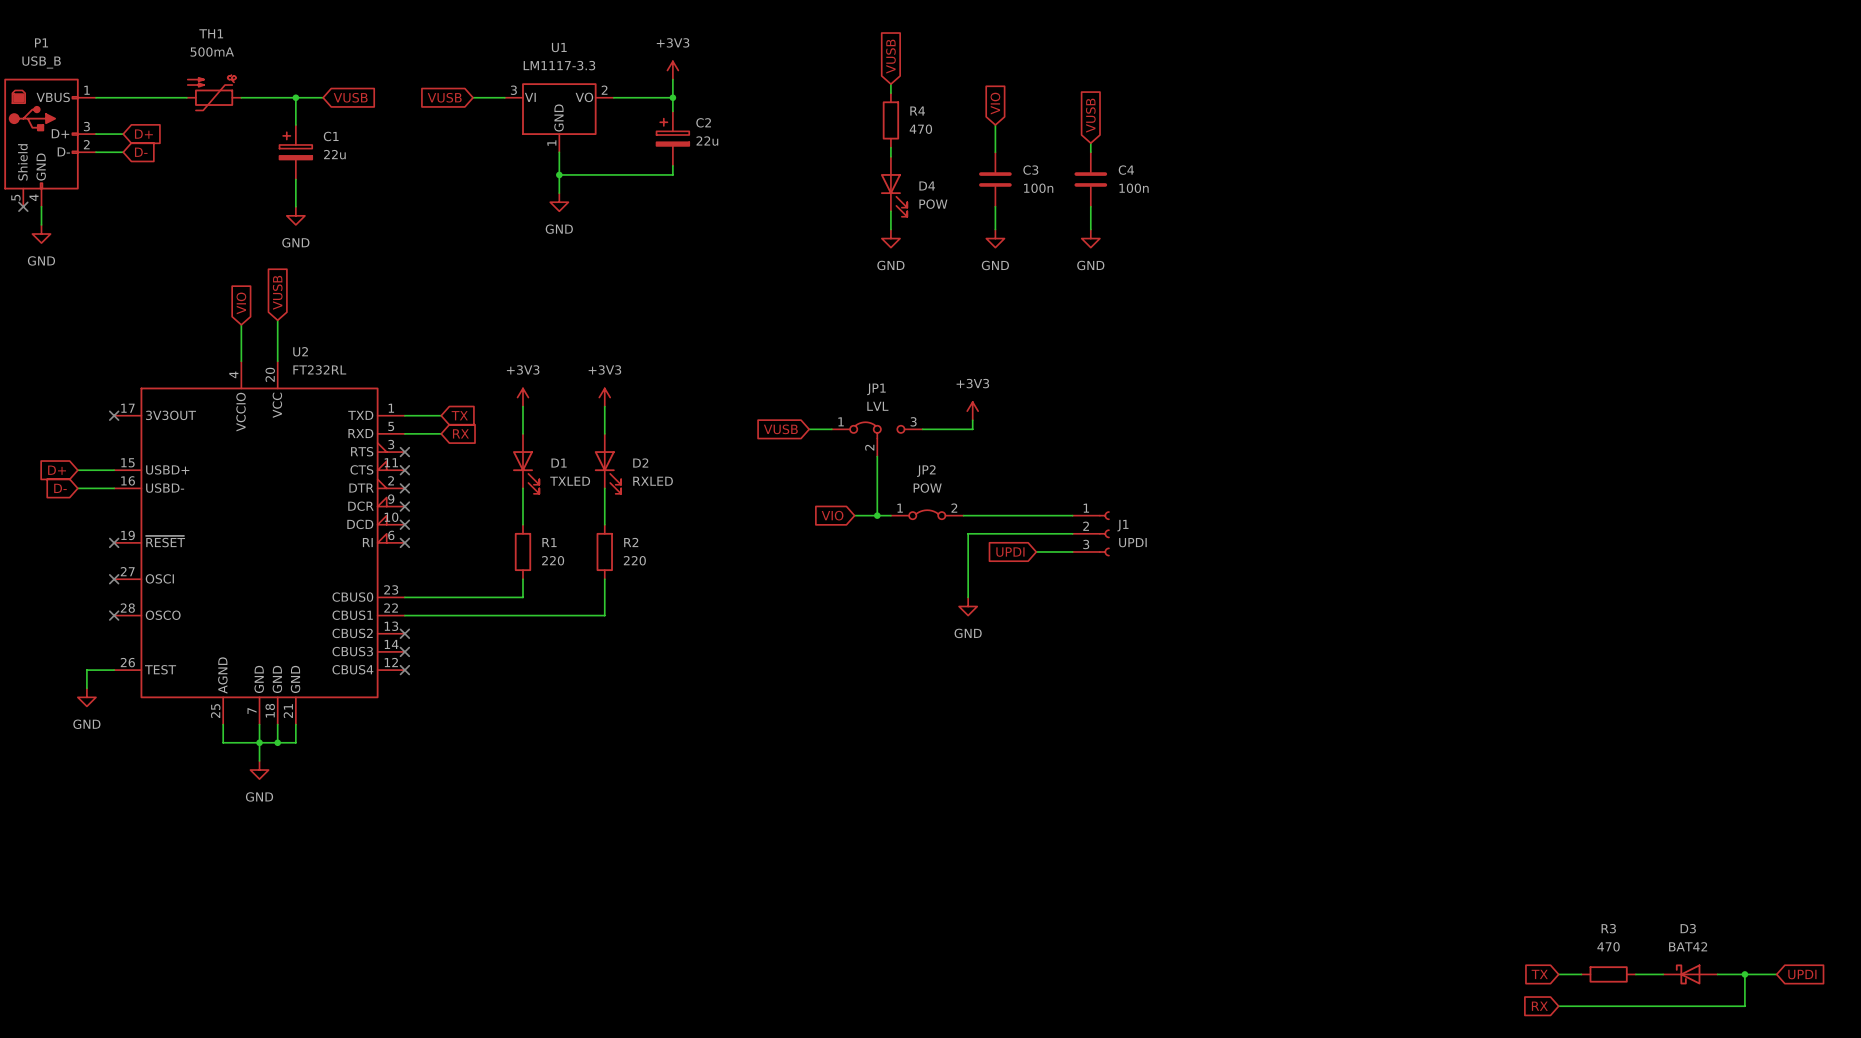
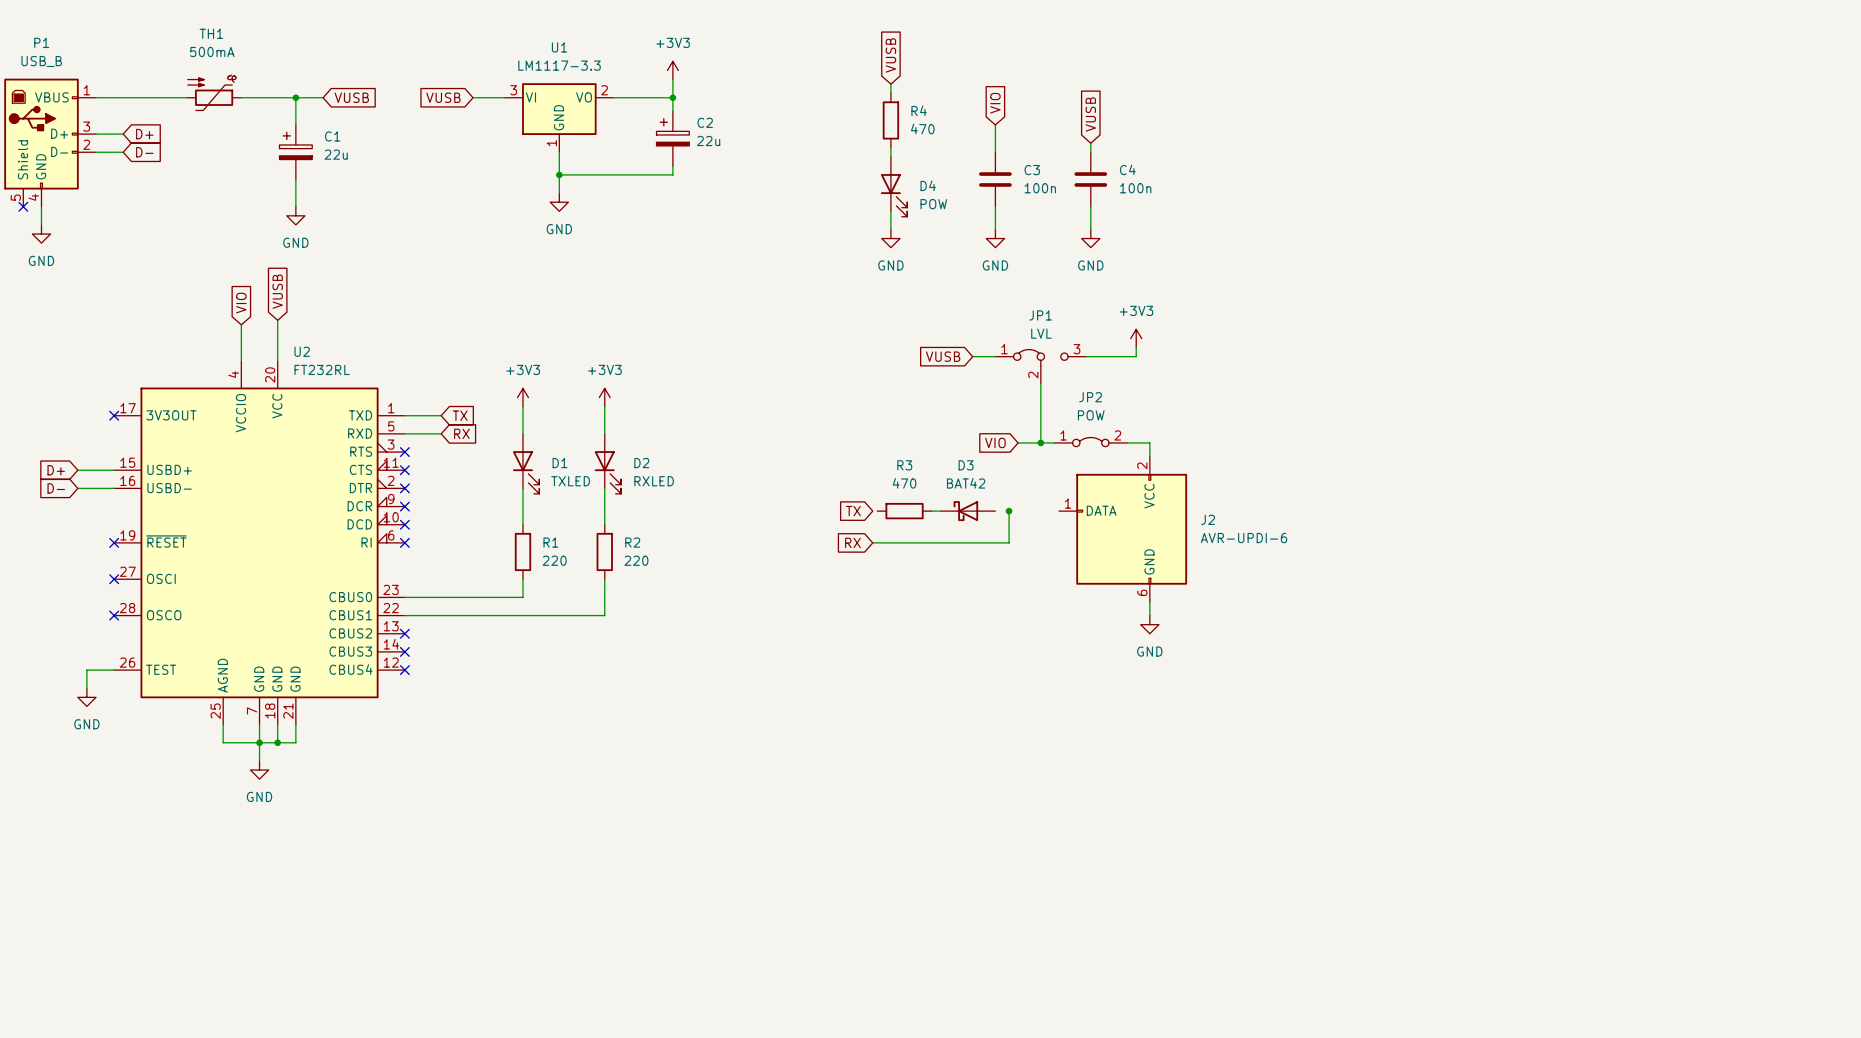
power symbol: none -> +3V3 (1136, 338)
wire: none -> (1136, 347) (1136, 356) (1086, 356)
global label: none -> VUSB (943, 356)
wire: none -> (972, 356) (995, 356)
wire: none -> (1040, 383) (1040, 442)
power symbol: +3V3 (972, 411) -> none
wire: (972, 420) (972, 429) (922, 429) -> none
global label: VUSB (780, 429) -> none
wire: (809, 429) (831, 429) -> none
JP1 position: (877, 439) -> (1040, 366)
global label: none -> VIO (995, 442)
junction: none -> (1040, 442)
wire: none -> (1127, 442) (1149, 442) (1149, 456)
wire: (877, 456) (877, 515) -> none
global label: none -> TX (853, 511)
wire: none -> (931, 511) (940, 511)
wire: none -> (1009, 511) (1009, 542) (872, 542)
junction: none -> (1009, 511)
JP2 position: (927, 514) -> (1090, 442)
global label: VIO (832, 515) -> none
wire: (854, 515) (890, 515) -> none
junction: (877, 515) -> none
wire: (963, 515) (1072, 515) -> none
J2: none -> AVR-UPDI-6 (1123, 529)
wire: (1072, 533) (968, 533) (968, 597) -> none
J1: UPDI (1091, 533) -> none
global label: none -> RX (852, 542)
wire: (1036, 551) (1072, 551) -> (1018, 442) (1054, 442)
global label: UPDI (1010, 552) -> none
wire: none -> (1149, 601) (1149, 615)
power symbol: GND (968, 606) -> none
power symbol: none -> GND (1149, 624)
global label: TX (1539, 974) -> none
wire: (1558, 974) (1581, 974) -> none
R3 position: (1608, 974) -> (904, 511)
wire: (1635, 974) (1663, 974) -> none
D3 position: (1690, 974) -> (968, 511)
wire: (1717, 974) (1776, 974) -> none
wire: (1744, 974) (1744, 1006) (1558, 1006) -> none
junction: (1744, 974) -> none
global label: UPDI (1802, 974) -> none
global label: RX (1539, 1006) -> none

